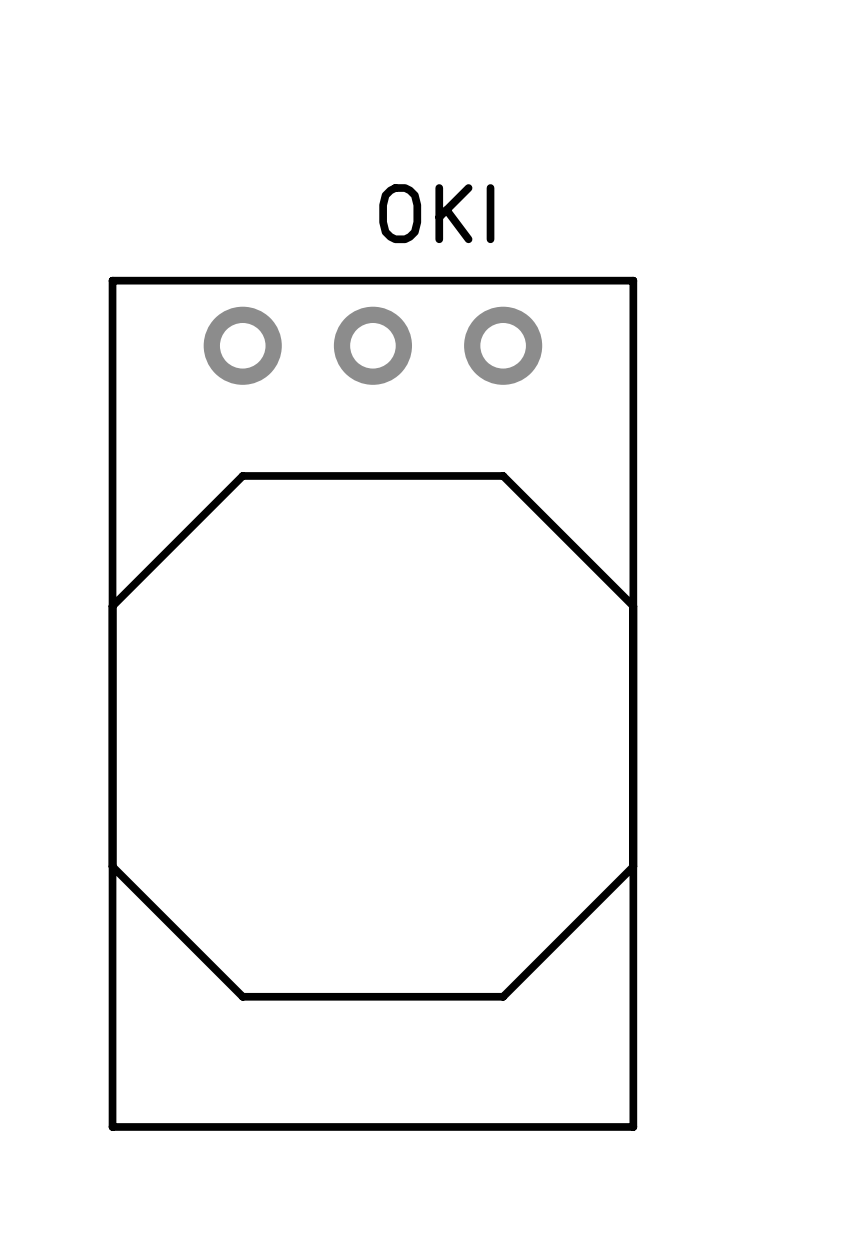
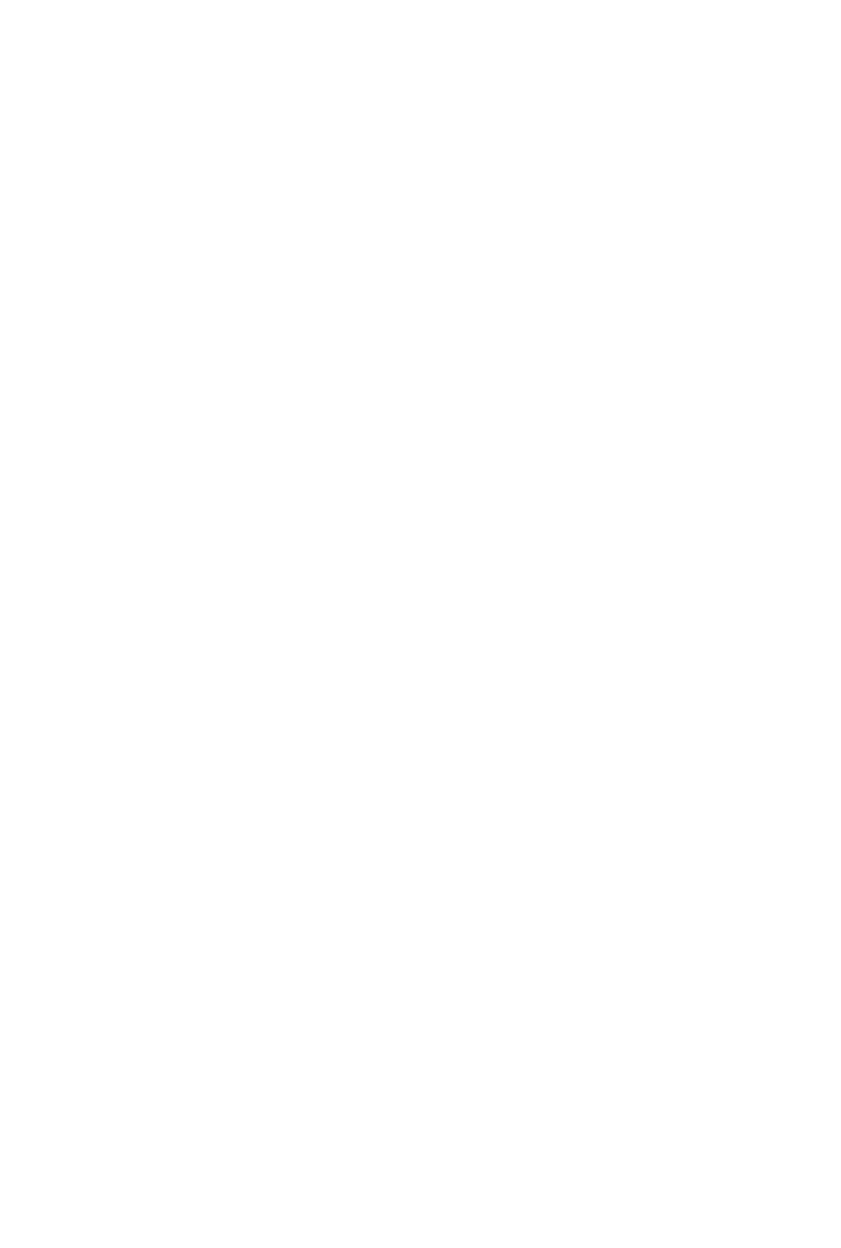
part: OKI (372, 703) -> none

